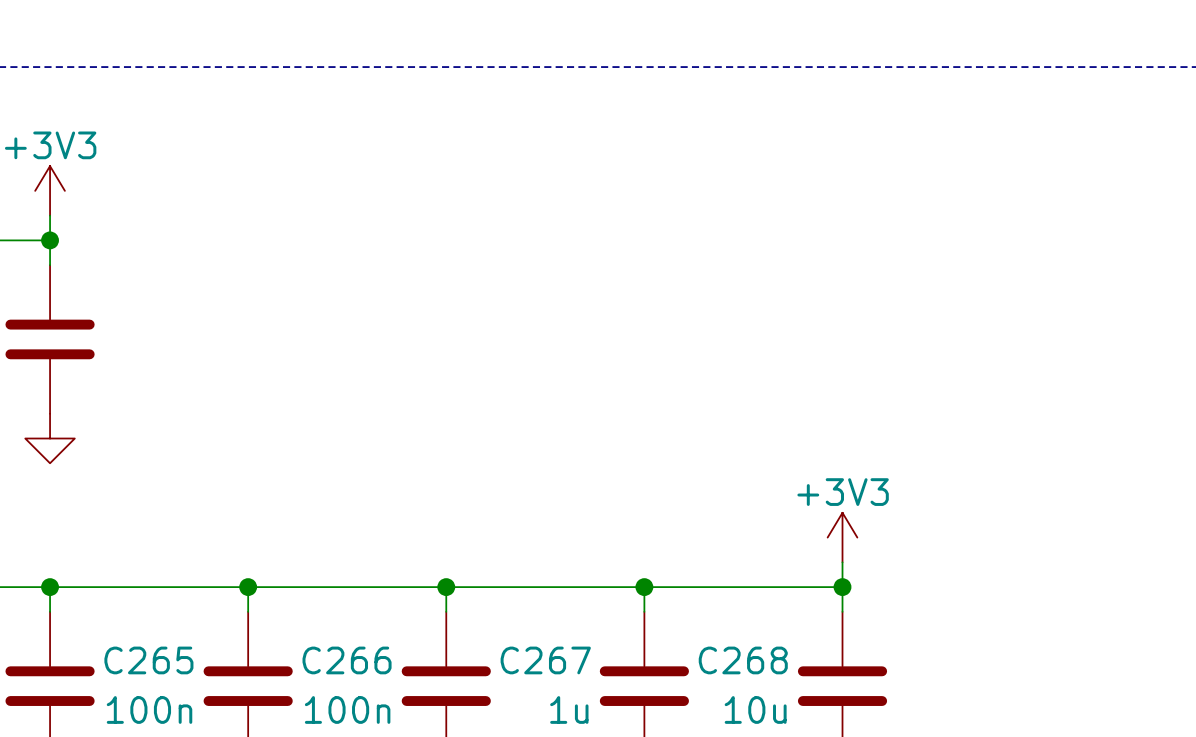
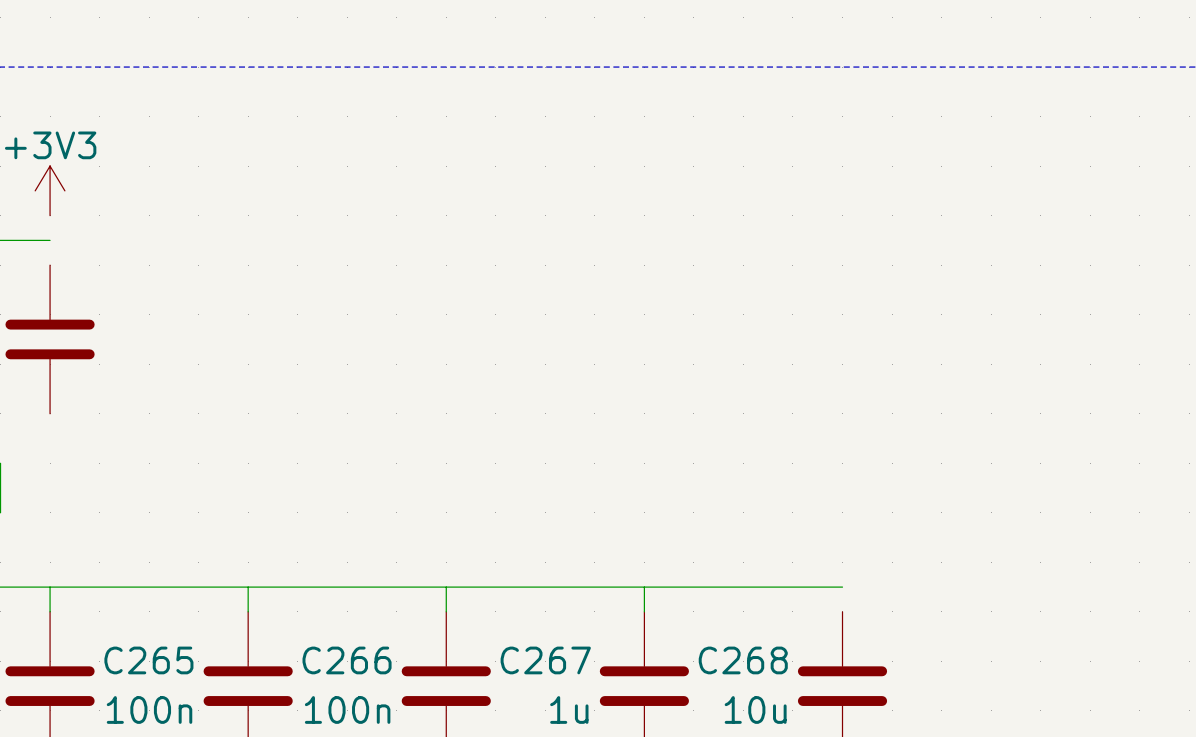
wire: (50, 215) (50, 265) -> (0, 463) (0, 512)
junction: (50, 240) -> none
power symbol: (50, 438) -> none
power symbol: +3V3 (842, 537) -> none
wire: (842, 562) (842, 611) -> none
junction: (50, 587) -> none
junction: (248, 587) -> none
junction: (446, 587) -> none
junction: (644, 587) -> none
junction: (842, 587) -> none

